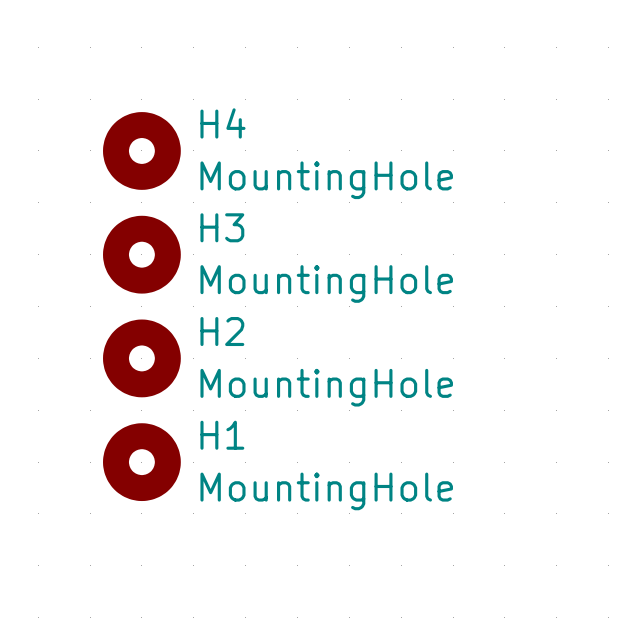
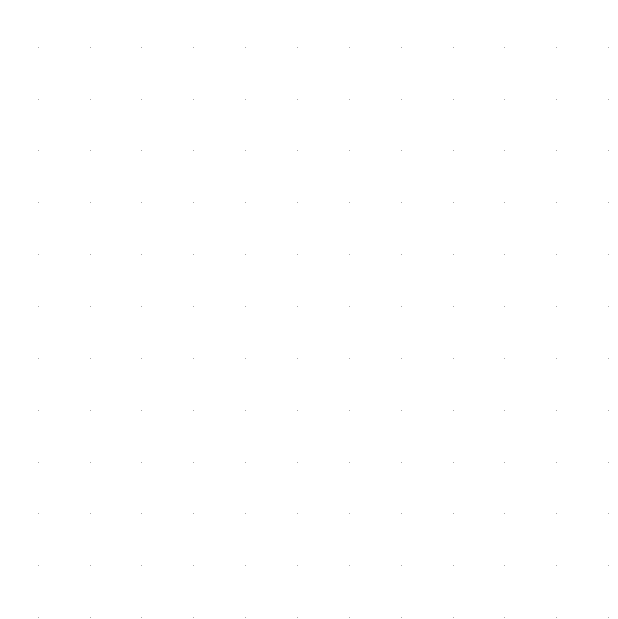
H4: MountingHole (141, 150) -> none
H3: MountingHole (141, 254) -> none
H2: MountingHole (141, 358) -> none
H1: MountingHole (141, 462) -> none

